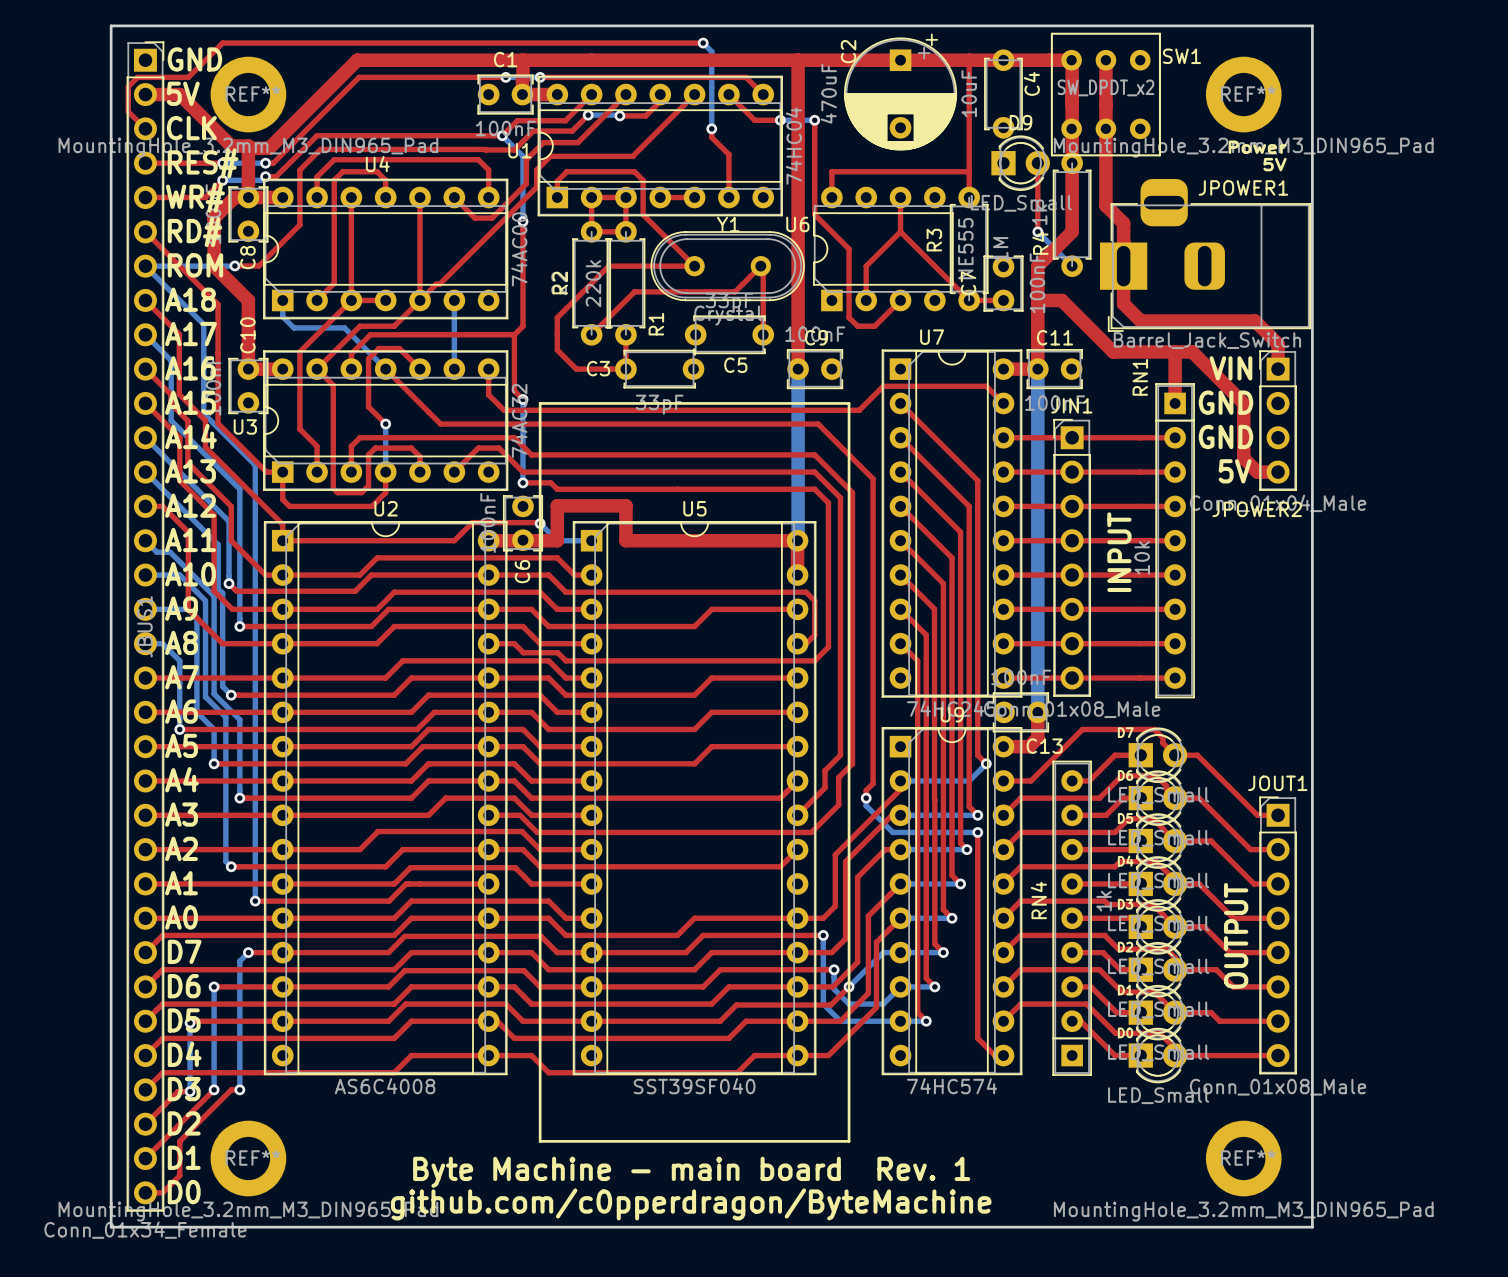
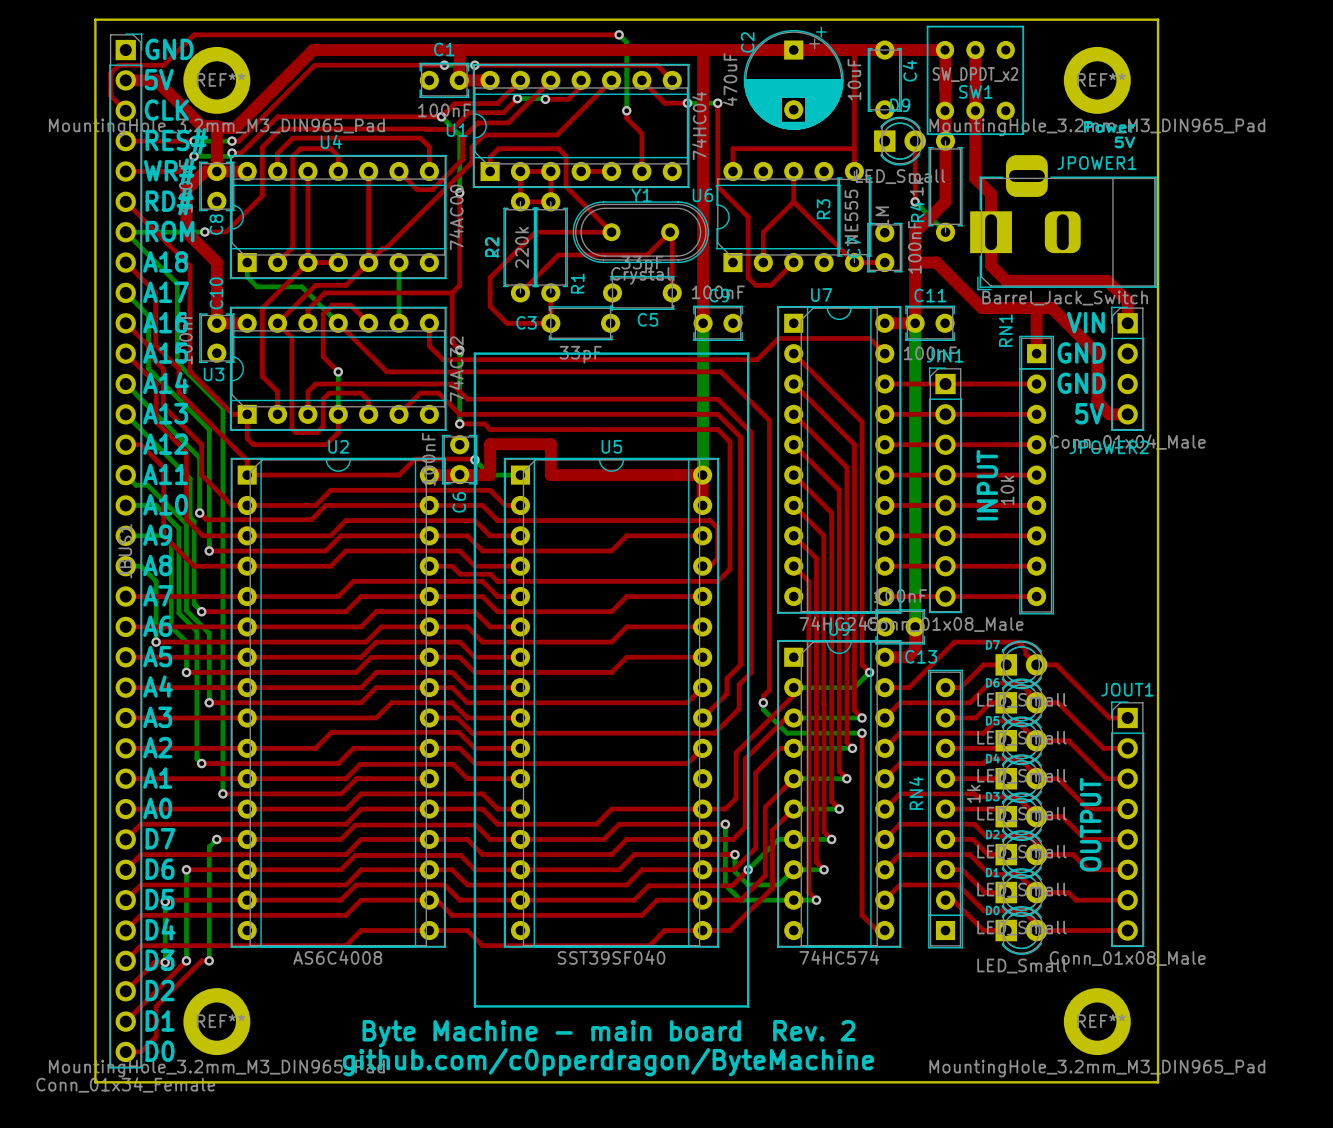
SW1 name position: SW1 (1181, 56) -> SW1 (975, 91)
text: Byte Machine - main board Rev. 1 (691, 1172) -> Byte Machine - main board Rev. 2 (608, 1033)

